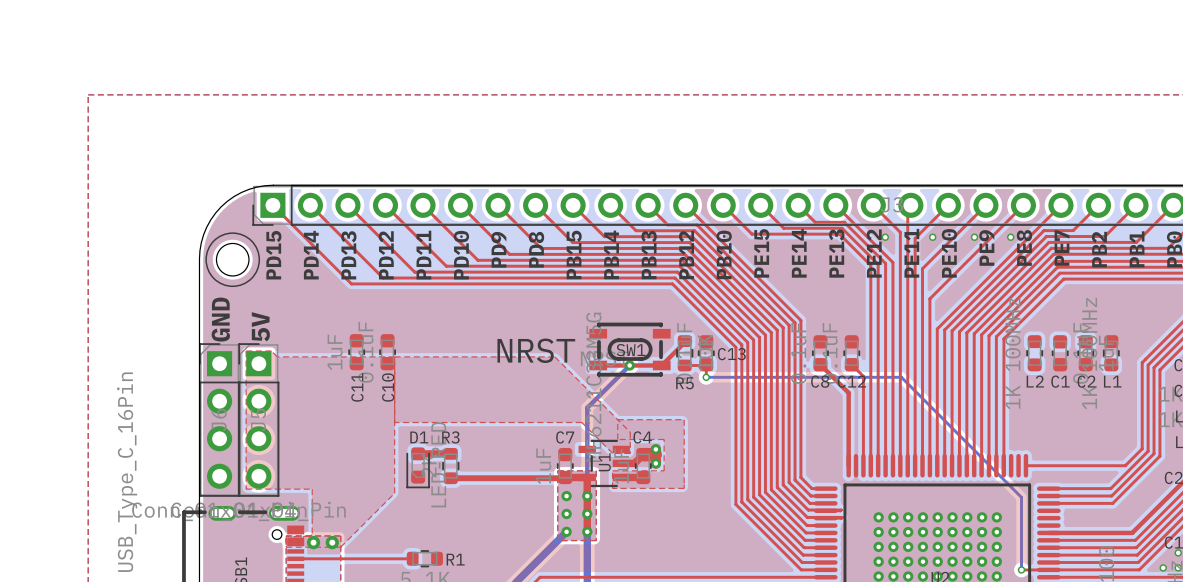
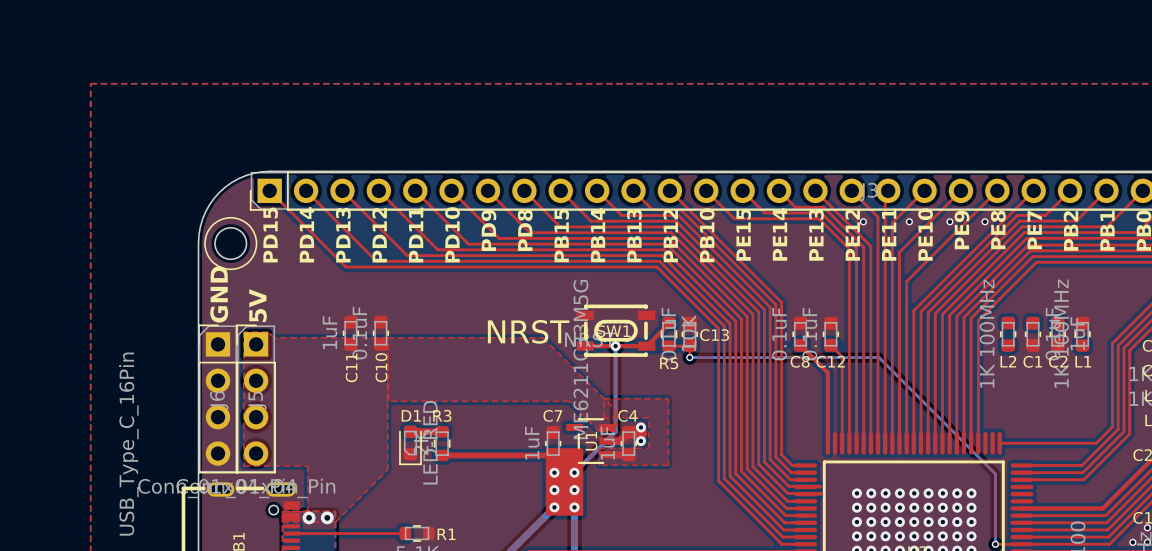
bottom track: (629, 365) (587, 407) (587, 496) -> (615, 346) (615, 431) (574, 472)
top zone outline: (557, 470) (596, 470) (596, 540) (557, 540) (557, 470) -> none
drawing: none -> [545, 448, 584, 516]

